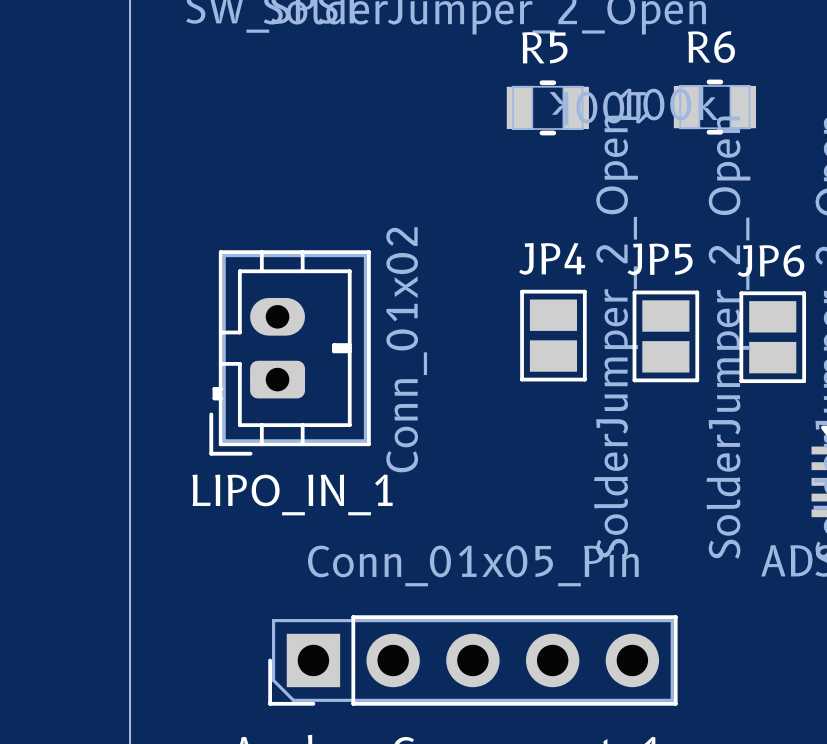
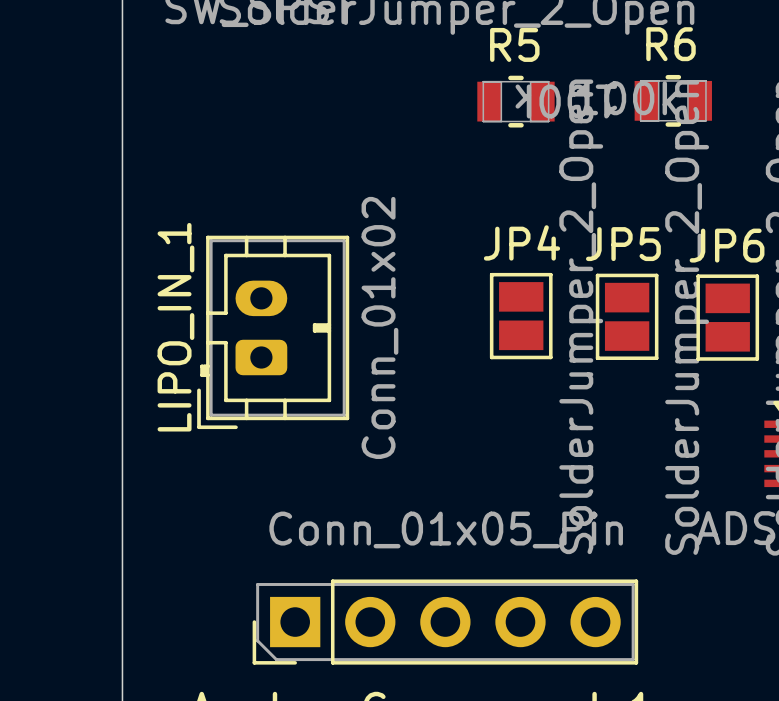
LIPO_IN_1 name rotation: 0° (292, 494) -> 90° counterclockwise (175, 327)

